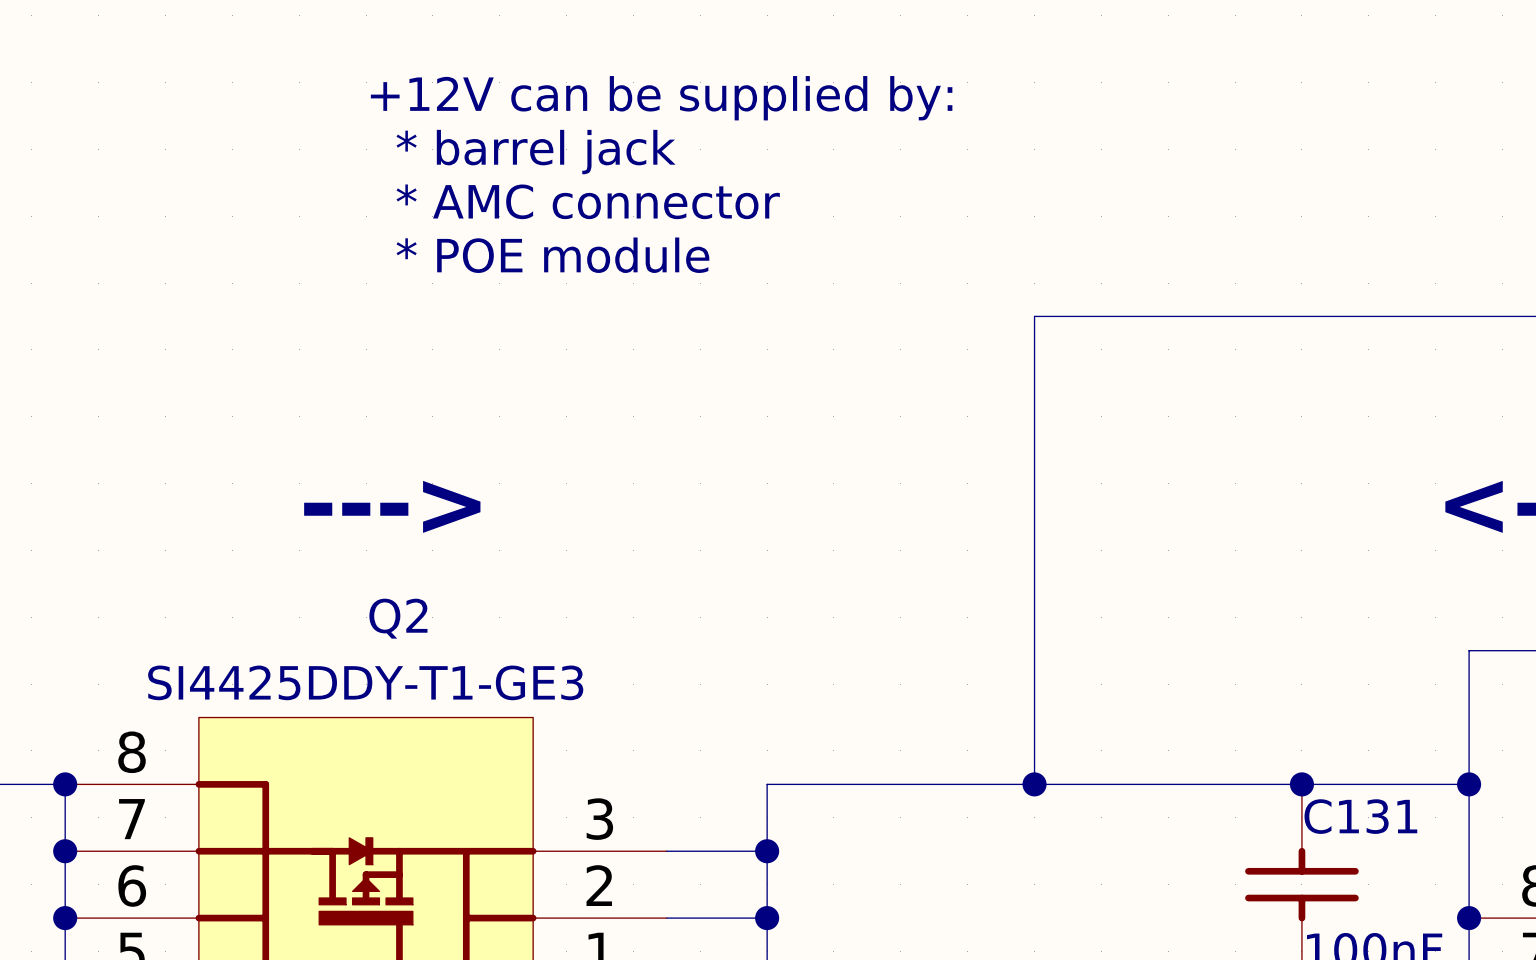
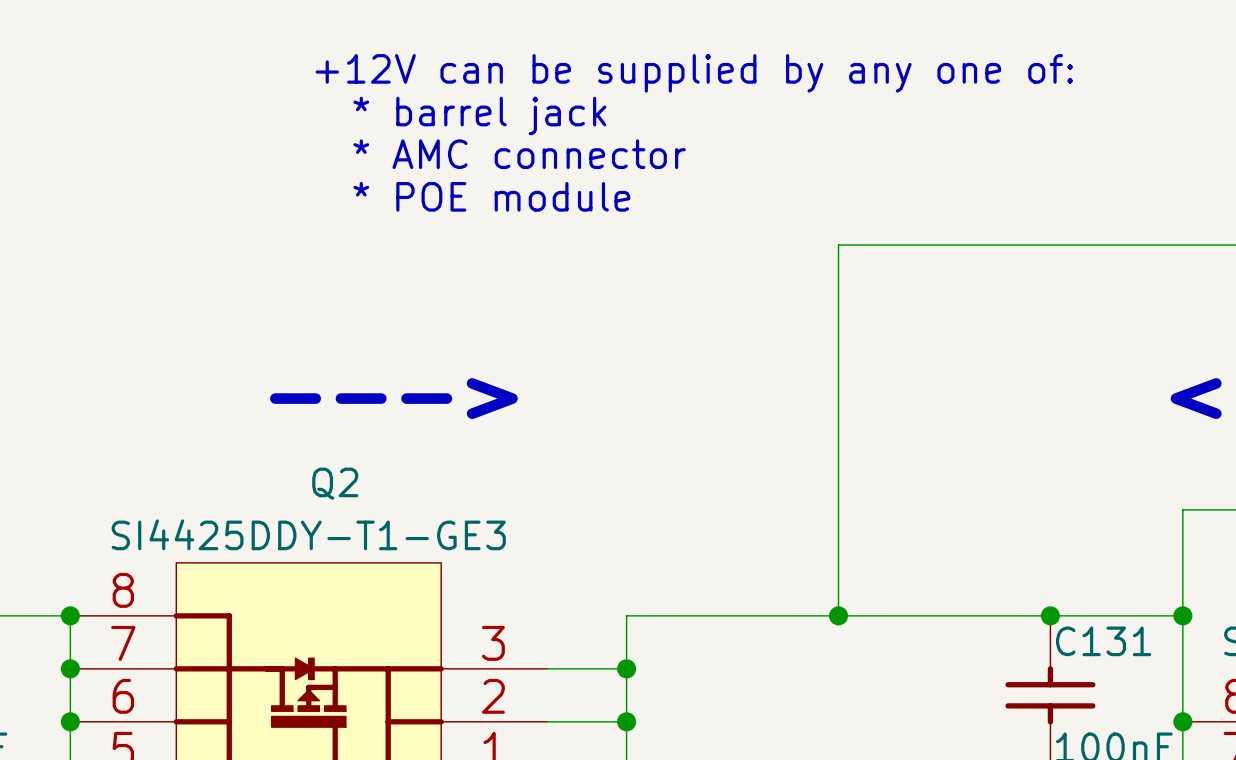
text: +12V can be supplied by: (661, 98) -> +12V can be supplied by any one of: (694, 73)

